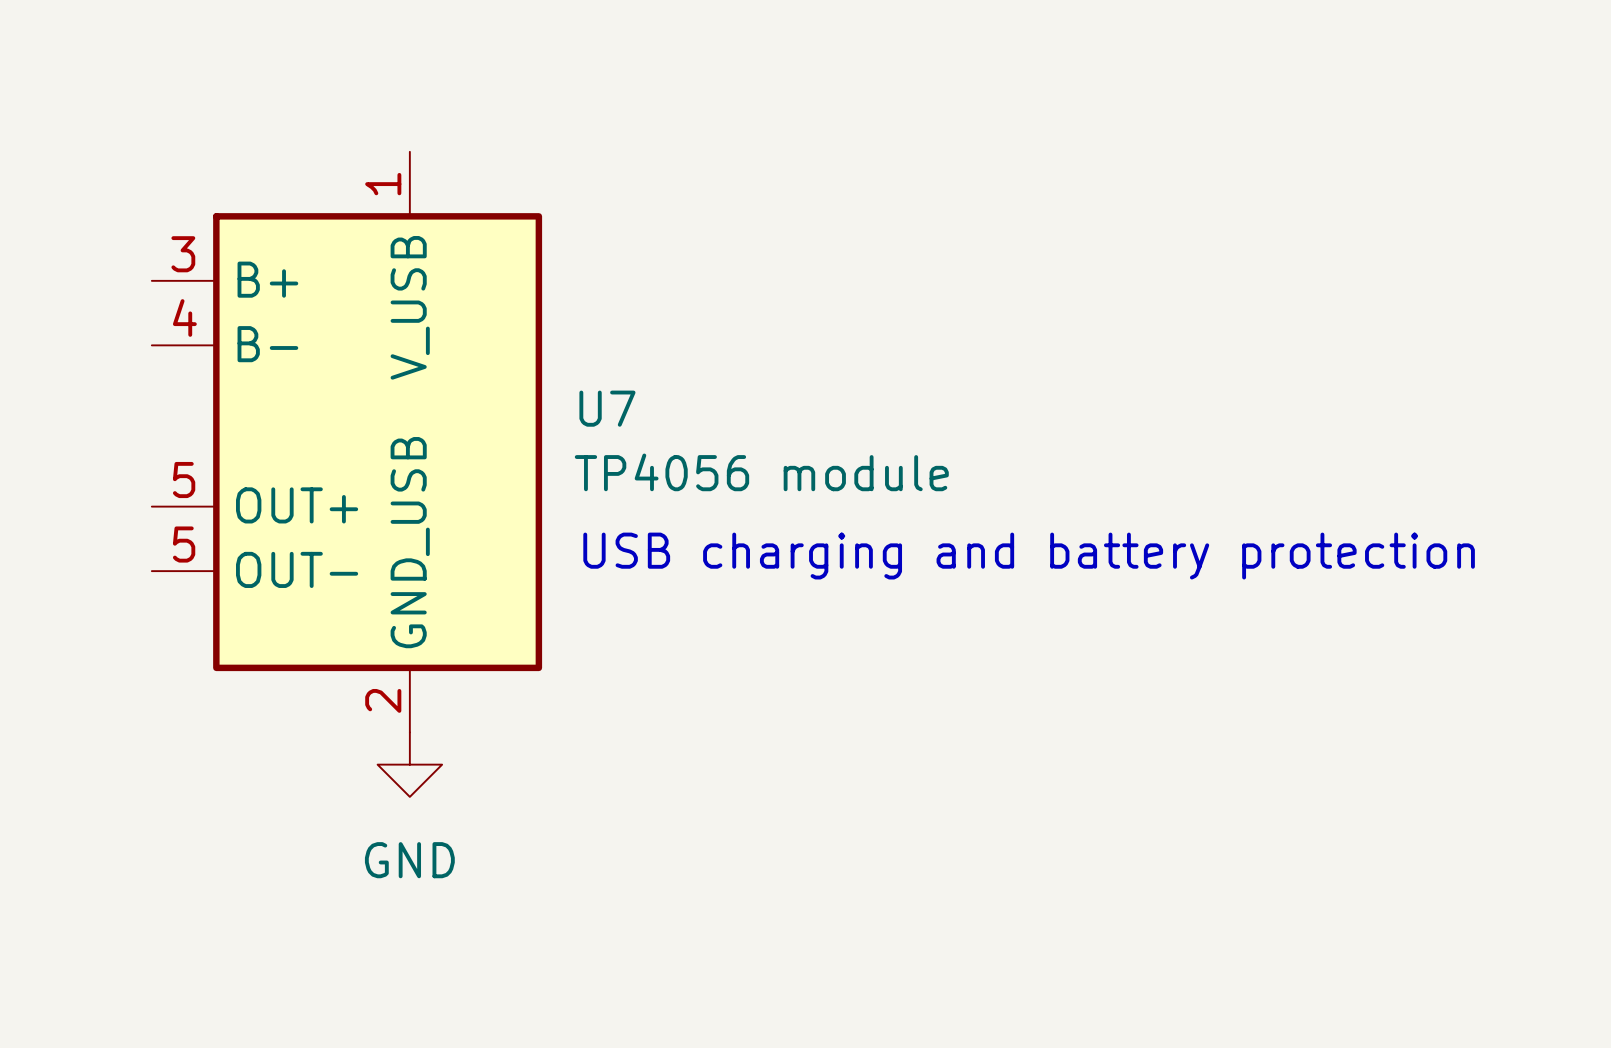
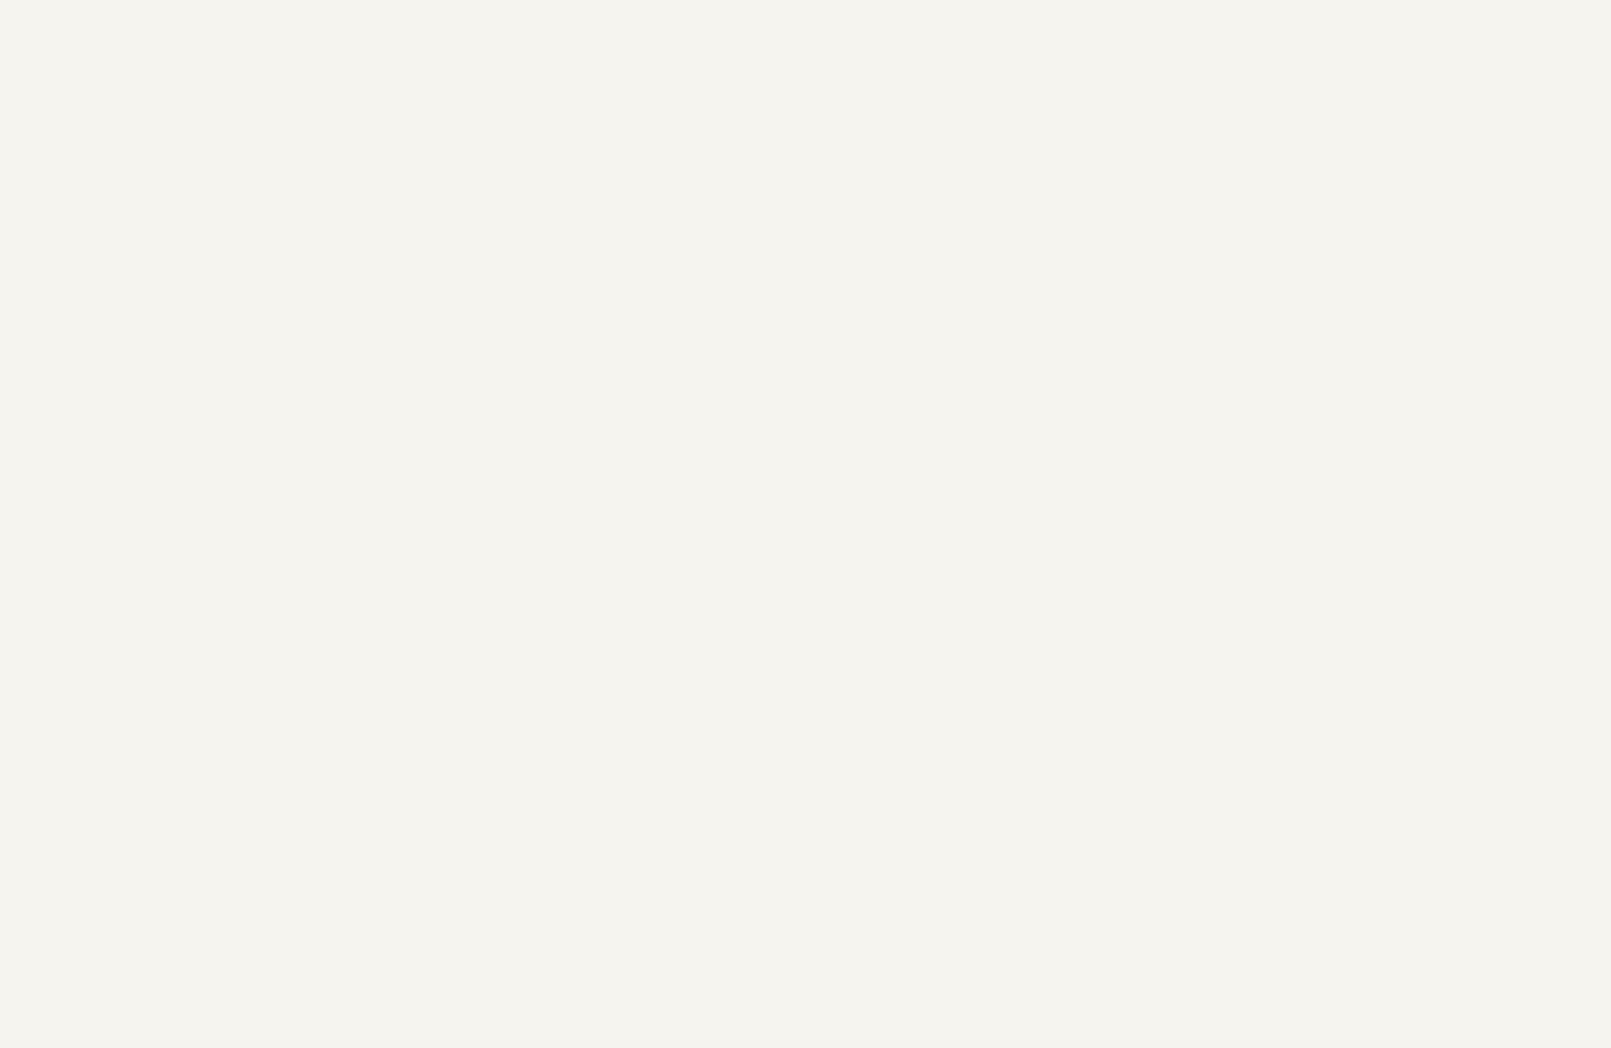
U7: TP4056 module (346, 442) -> none
text: USB charging and battery protection (1029, 556) -> none
power symbol: GND (409, 764) -> none

